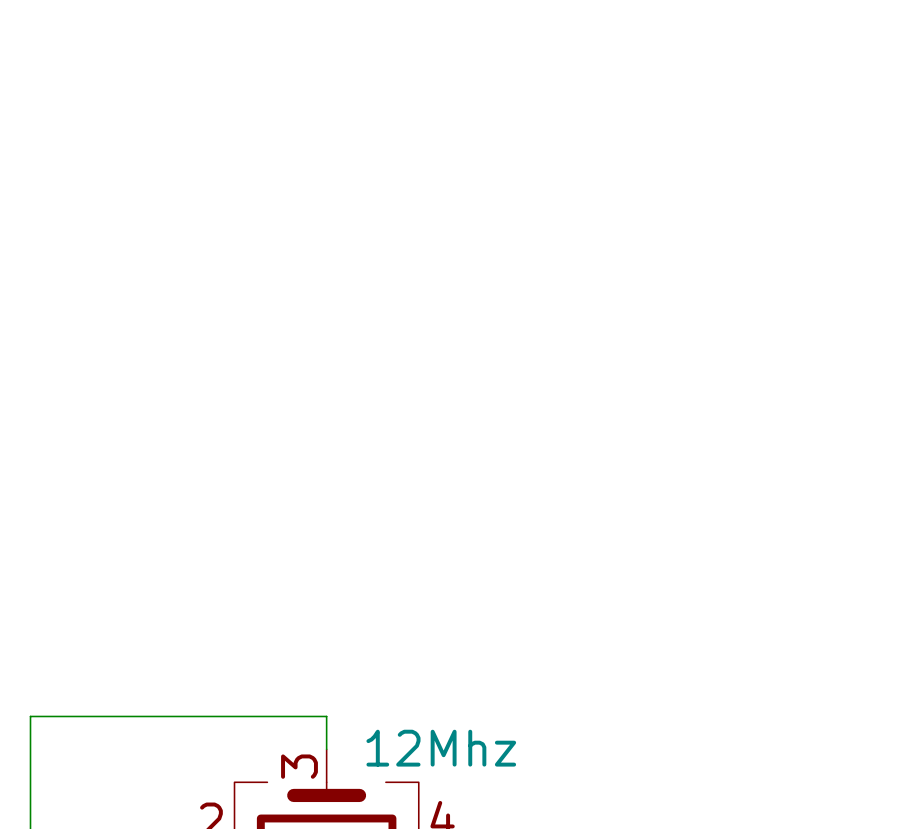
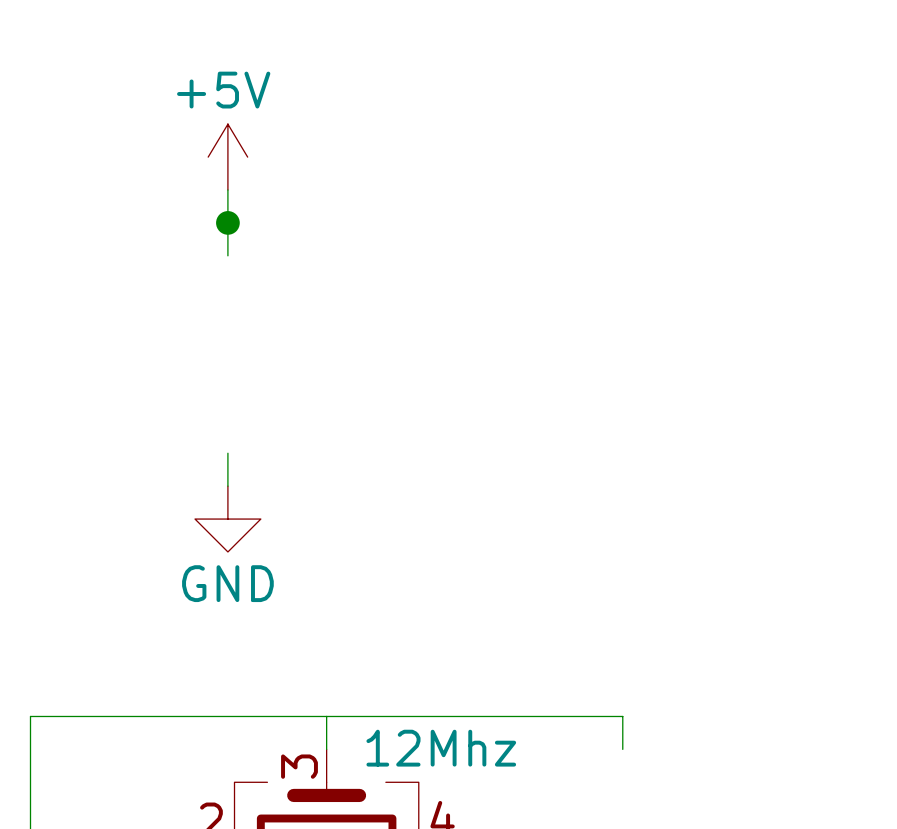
power symbol: none -> +5V (227, 157)
wire: none -> (227, 190) (227, 255)
junction: none -> (227, 222)
wire: none -> (227, 453) (227, 486)
power symbol: none -> GND (227, 519)
wire: none -> (326, 716) (622, 716) (622, 749)

